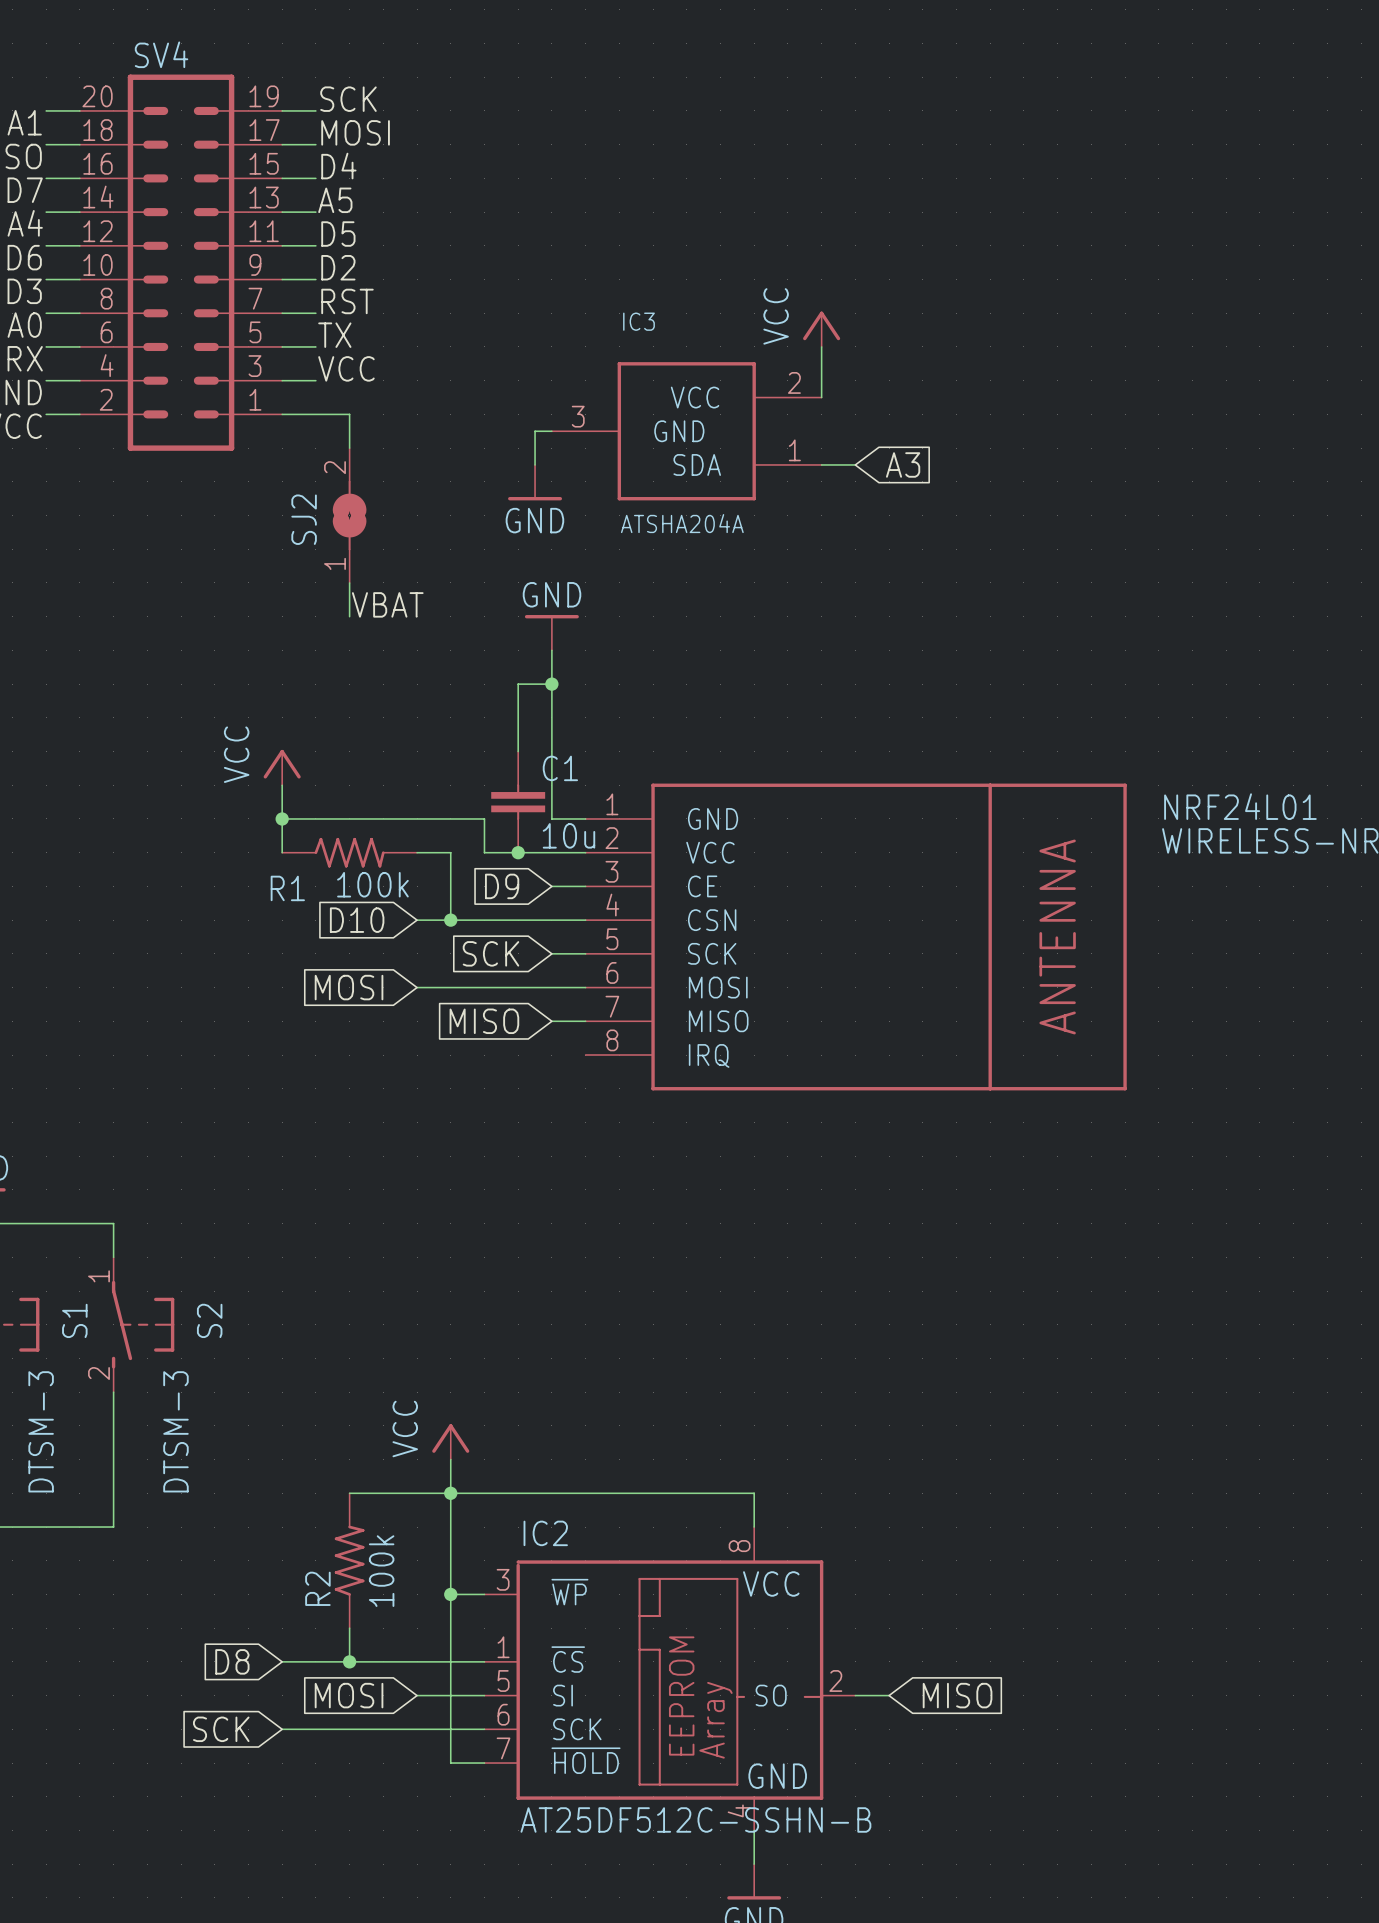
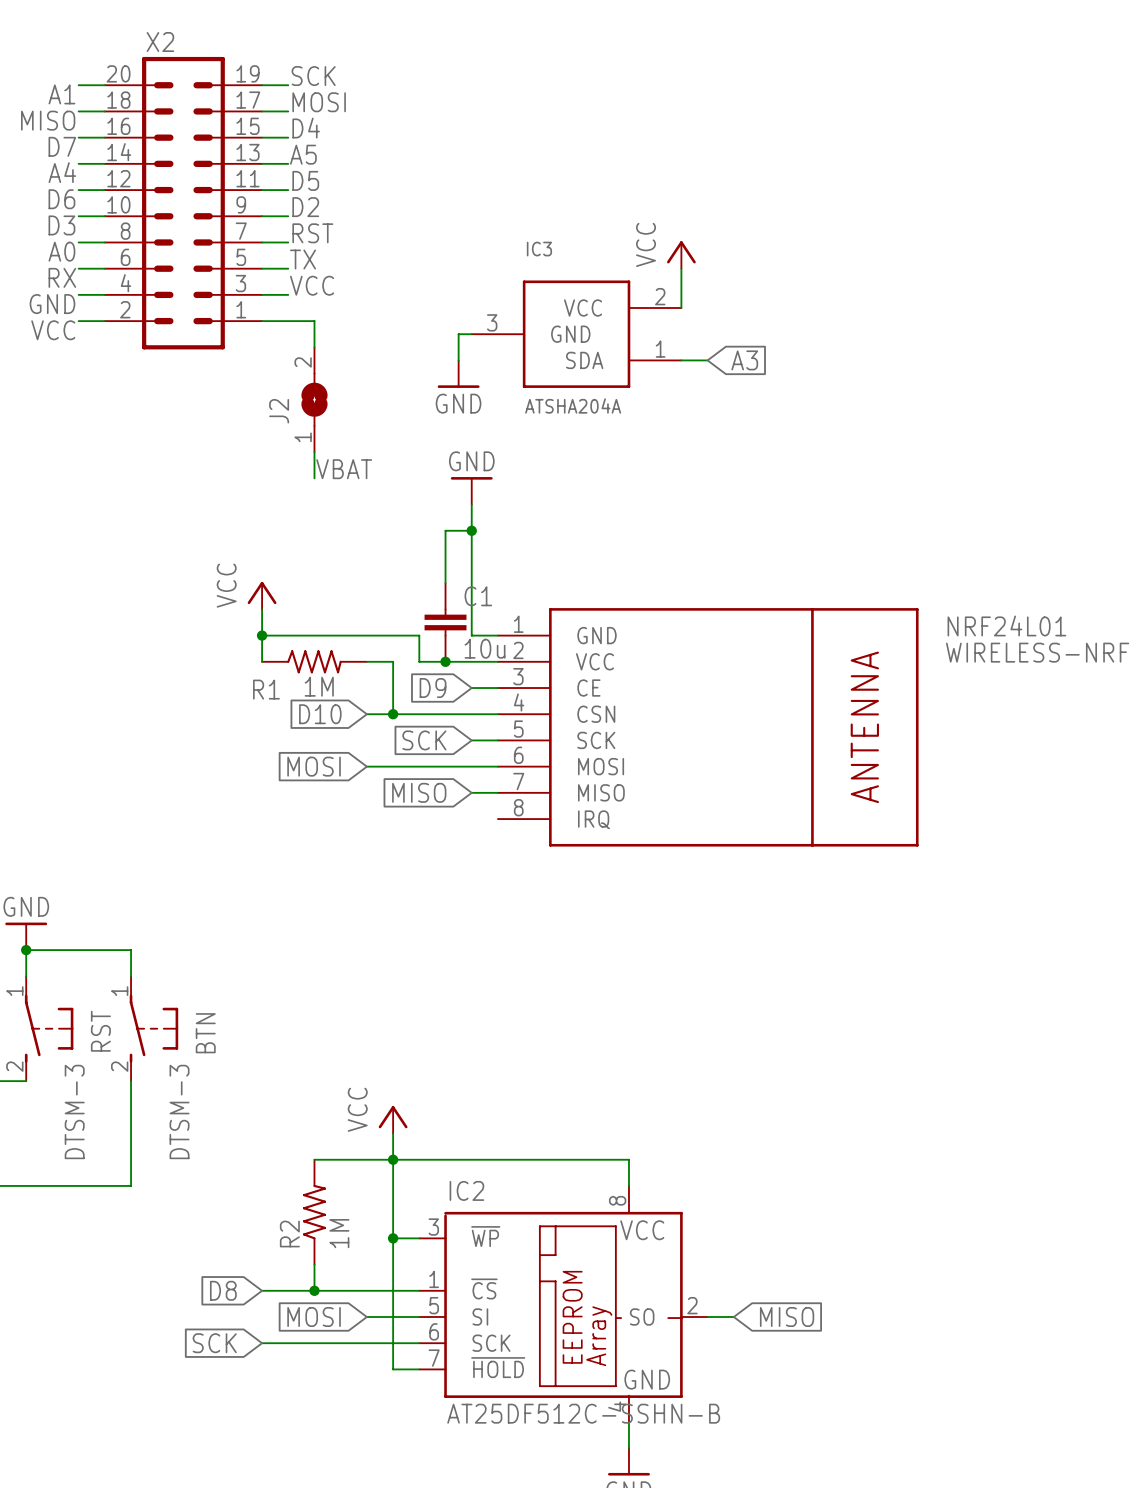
SV4 name: SV4 (161, 54) -> X2 (160, 41)
SJ2 name: SJ2 (304, 519) -> J2 (279, 411)
R1 value: 100k (372, 884) -> 1M (319, 686)
S1 name: S1 (74, 1320) -> RST (100, 1031)
S2 name: S2 (209, 1320) -> BTN (205, 1033)
R2 value: 100k (381, 1571) -> 1M (339, 1233)

